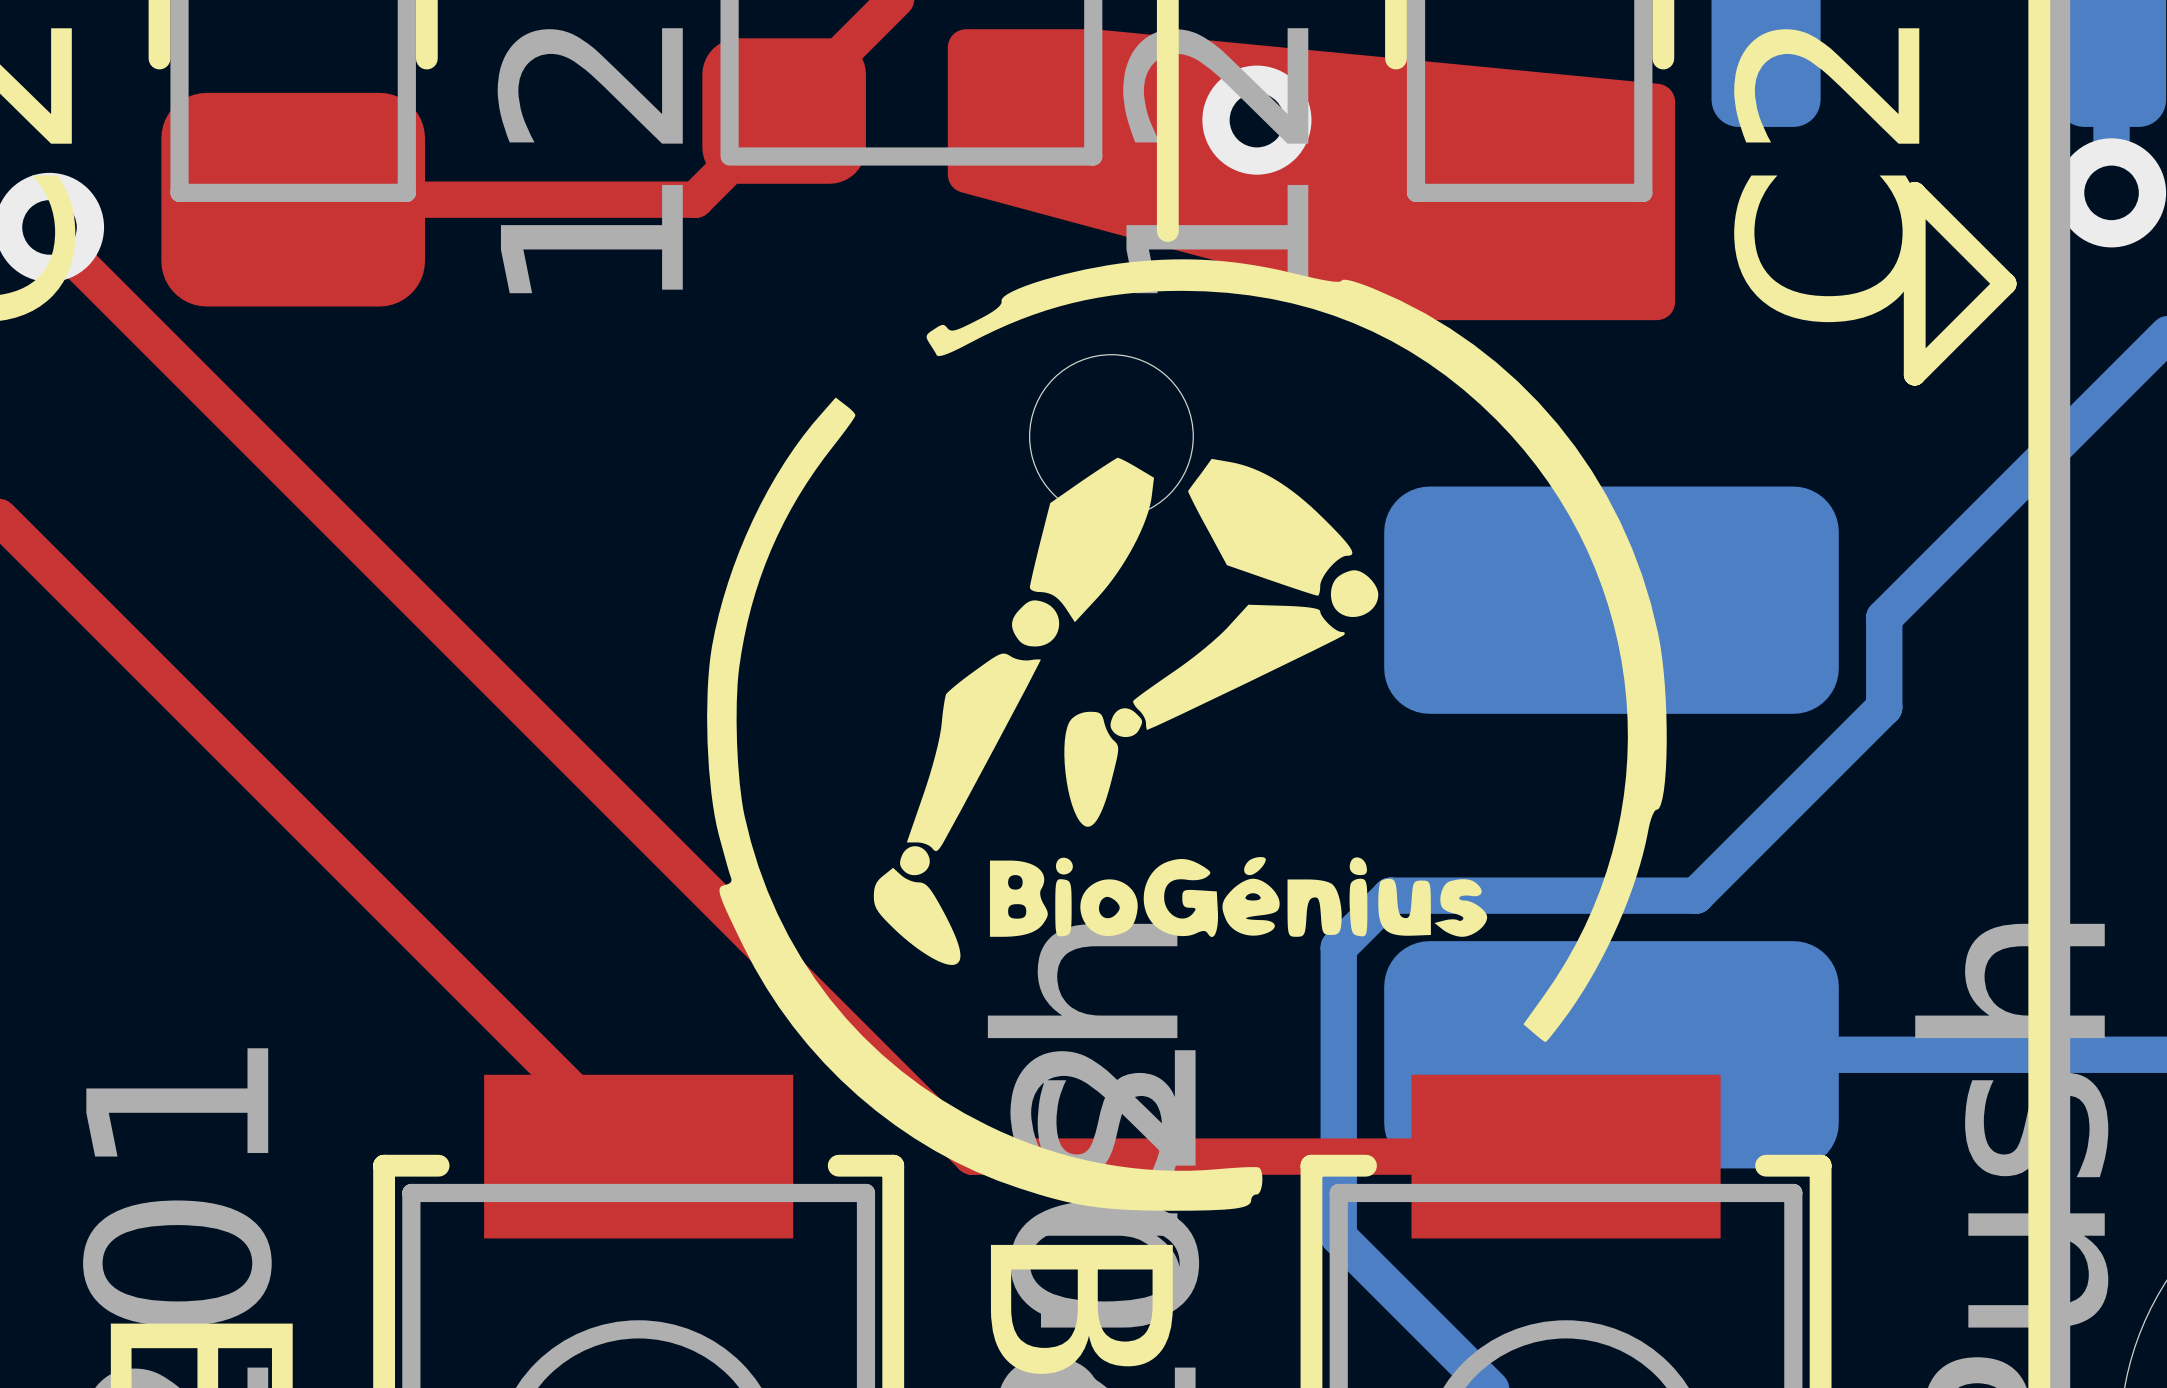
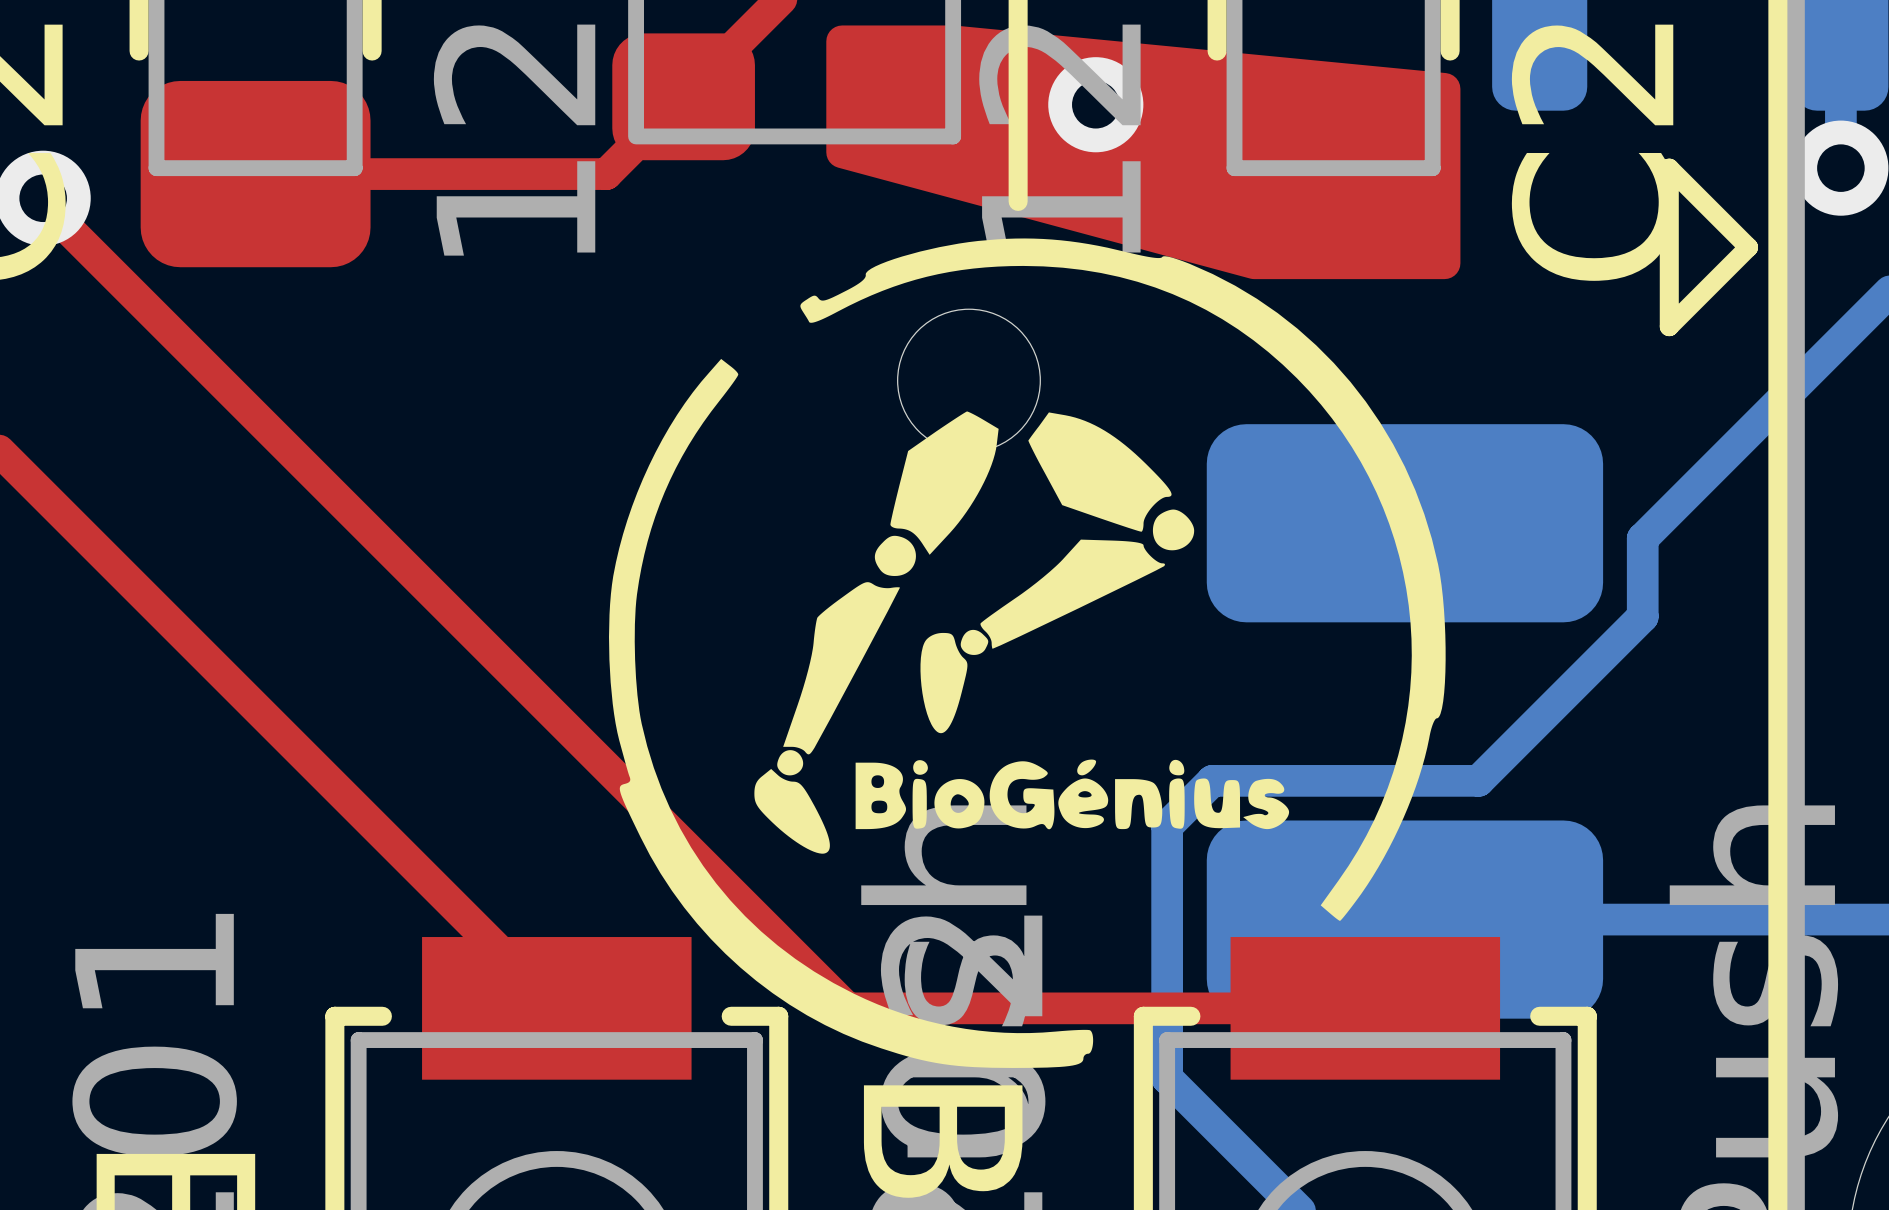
drawing position: (1270, 527) -> (1099, 472)
drawing position: (1091, 539) -> (944, 483)
drawing position: (1354, 593) -> (1173, 529)
drawing position: (1035, 623) -> (895, 555)
drawing position: (1296, 650) -> (1123, 579)
drawing position: (1238, 667) -> (1072, 594)
drawing position: (1126, 722) -> (974, 642)
drawing position: (973, 752) -> (841, 668)
drawing position: (1091, 769) -> (943, 683)
drawing position: (984, 804) -> (851, 713)
drawing position: (914, 860) -> (790, 762)
drawing position: (1064, 866) -> (920, 767)
drawing position: (1254, 866) -> (1086, 767)
drawing position: (1358, 866) -> (1176, 767)
drawing position: (1180, 897) -> (1022, 795)
drawing position: (1018, 898) -> (880, 795)
drawing position: (1063, 907) -> (919, 803)
drawing position: (1109, 907) -> (959, 803)
drawing position: (1251, 907) -> (1083, 803)
drawing position: (1358, 907) -> (1176, 803)
drawing position: (1404, 907) -> (1217, 803)
drawing position: (1460, 907) -> (1266, 803)
drawing position: (1314, 908) -> (1138, 804)
drawing position: (917, 916) -> (792, 811)

